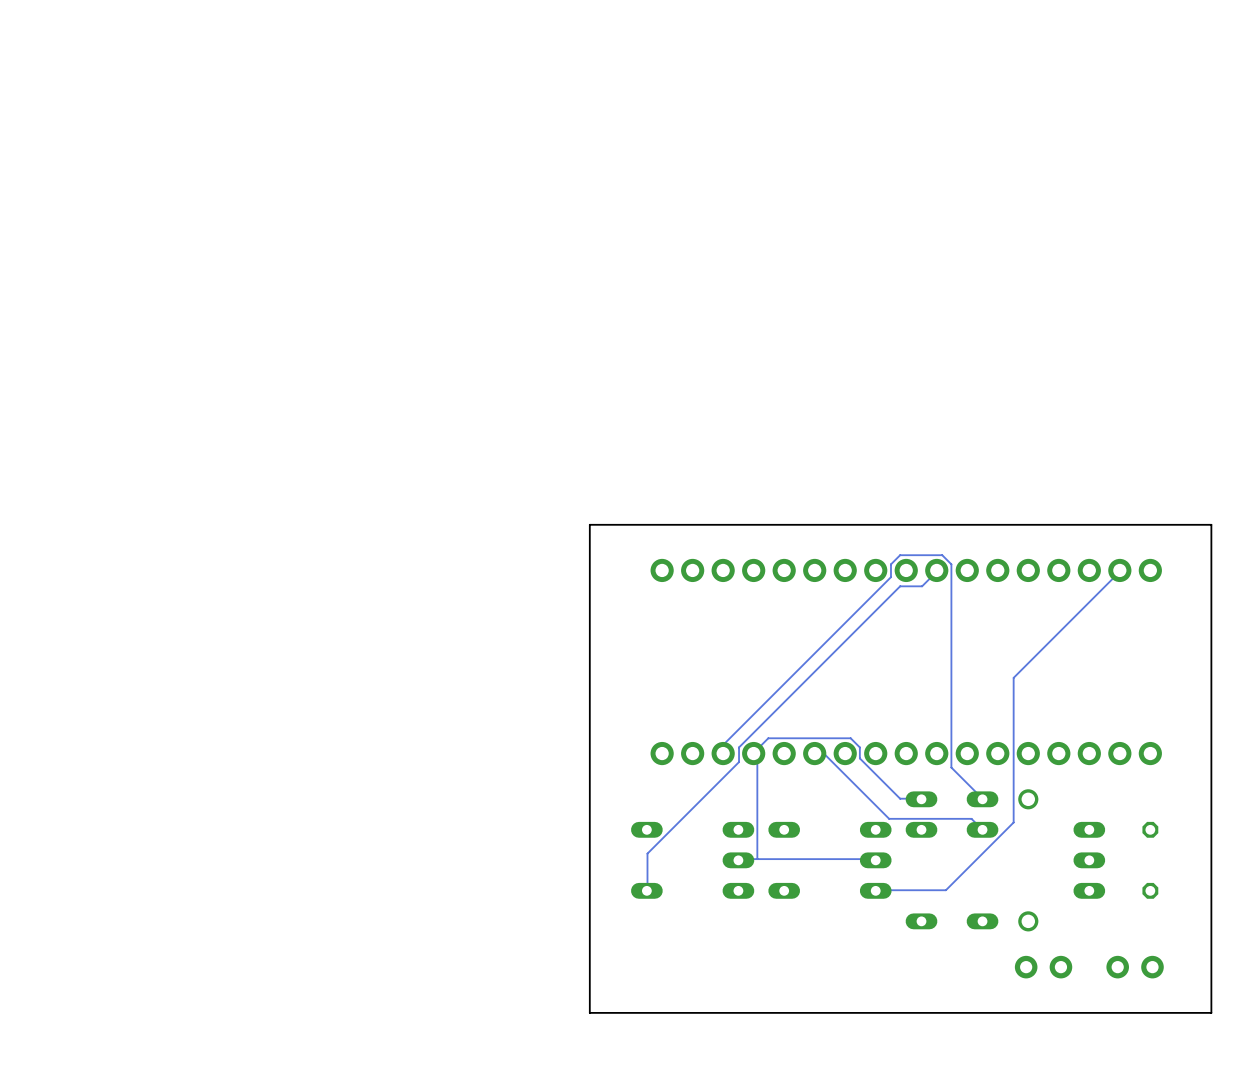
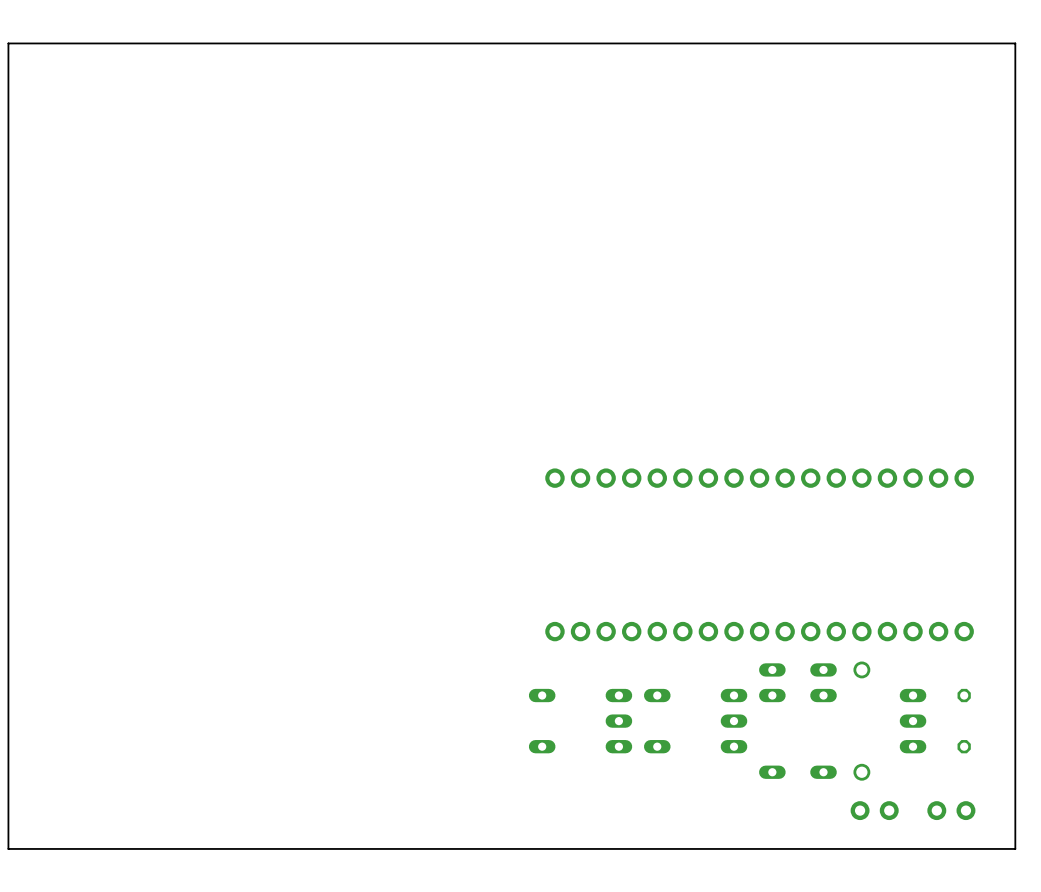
board edge: (1211, 524) (589, 524) (589, 1012) -> (1015, 439) (1015, 43) (8, 43) (8, 848) (494, 848)
track: (936, 570) (922, 586) (900, 586) (739, 747) (739, 762) (647, 853) (646, 890) -> none
track: (1119, 570) (1013, 677) (1013, 822) (945, 890) (875, 890) -> none
track: (723, 753) (724, 743) (890, 577) (890, 564) (900, 555) (942, 555) (951, 564) (951, 767) (982, 799) -> none
track: (814, 753) (825, 754) (889, 818) (971, 818) (982, 829) -> none
track: (921, 799) (900, 798) (859, 758) (859, 747) (850, 738) (768, 738) (753, 752) (757, 758) (757, 859) -> none
track: (875, 860) (738, 860) -> none

